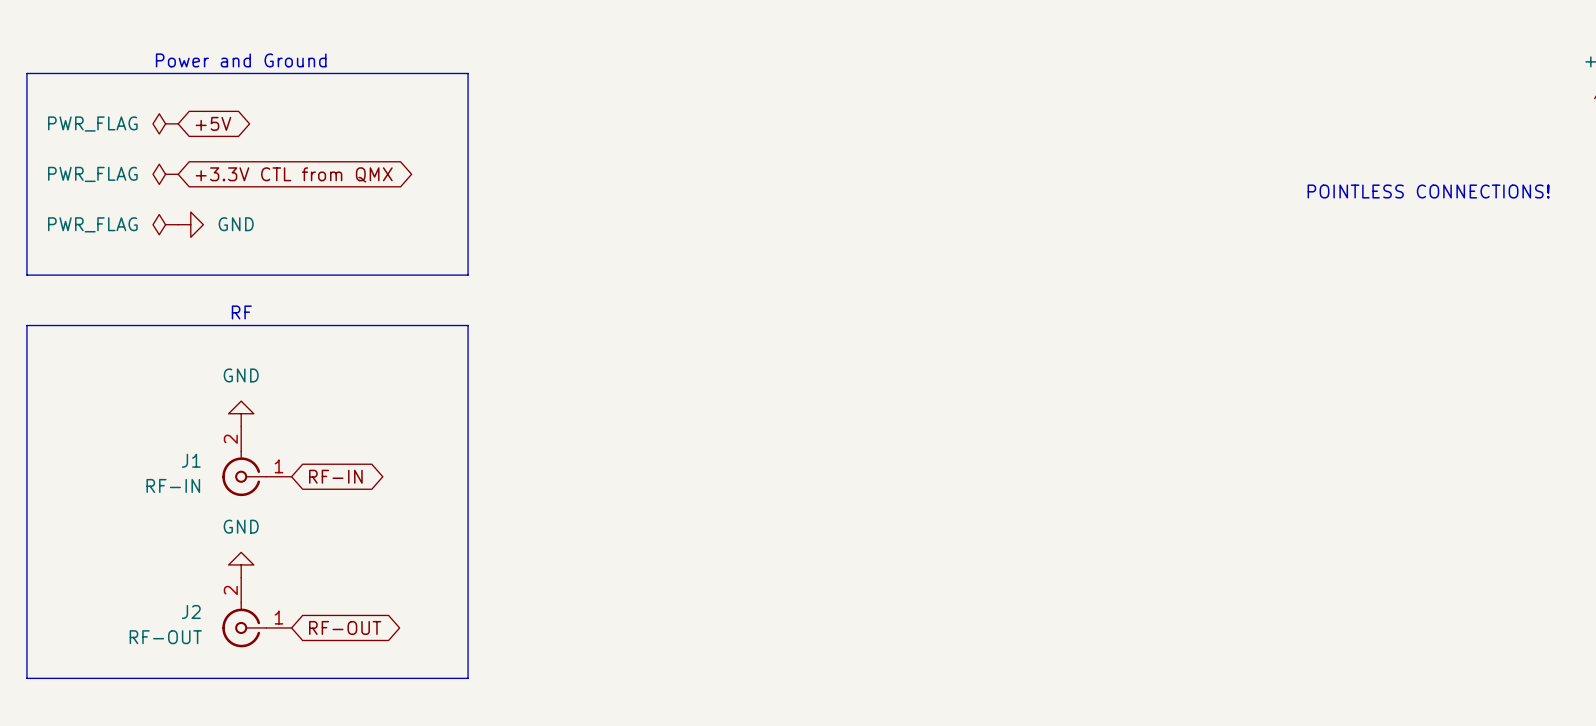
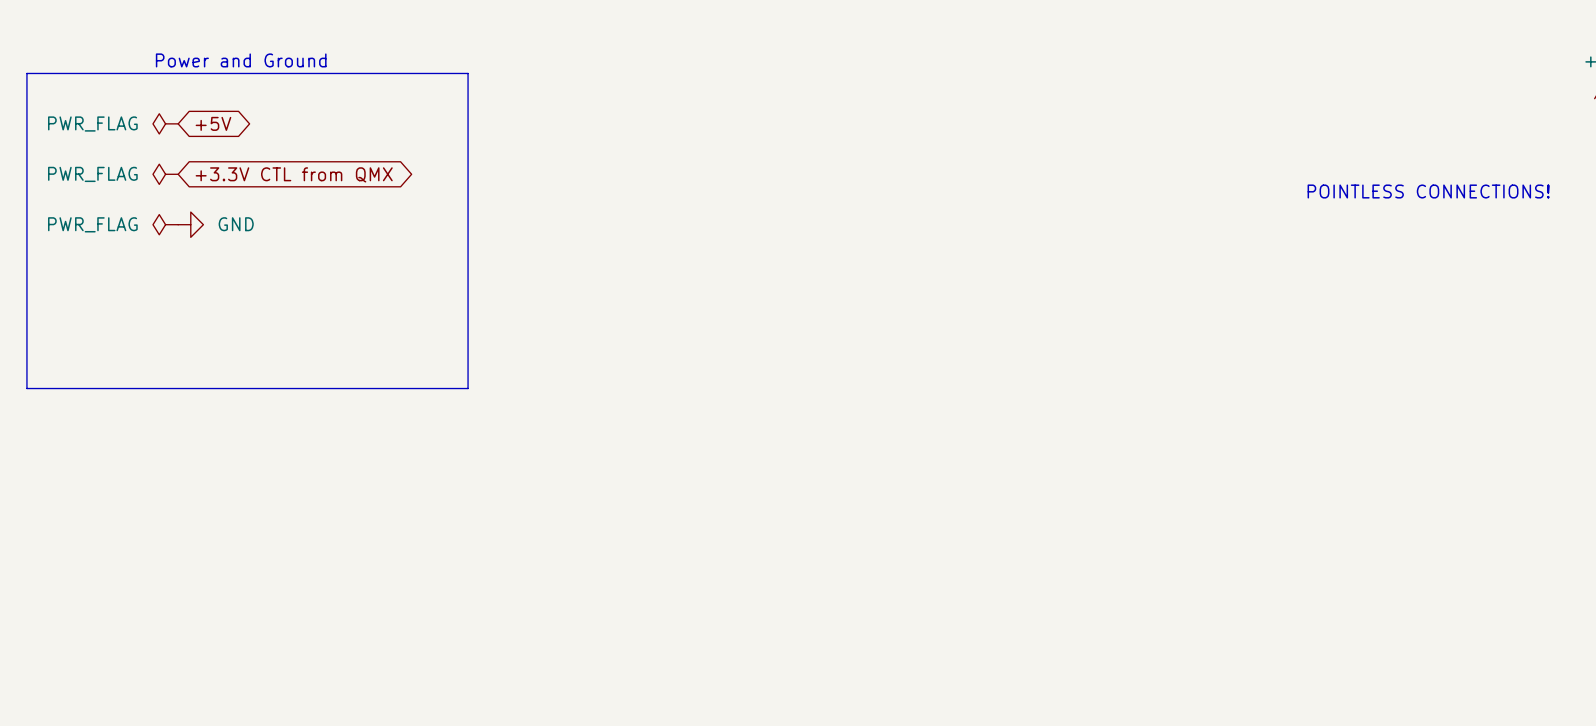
line: (26, 275) (468, 275) -> (26, 275) (26, 325)
text: RF (241, 312) -> none
line: (26, 325) (468, 325) -> (468, 275) (468, 325)
line: (26, 388) (26, 678) (468, 678) (468, 388) -> (26, 388) (468, 388)
power symbol: GND (241, 413) -> none
J1: RF-IN (256, 461) -> none
global label: RF-IN (335, 476) -> none
power symbol: GND (241, 564) -> none
J2: RF-OUT (256, 612) -> none
global label: RF-OUT (345, 627) -> none

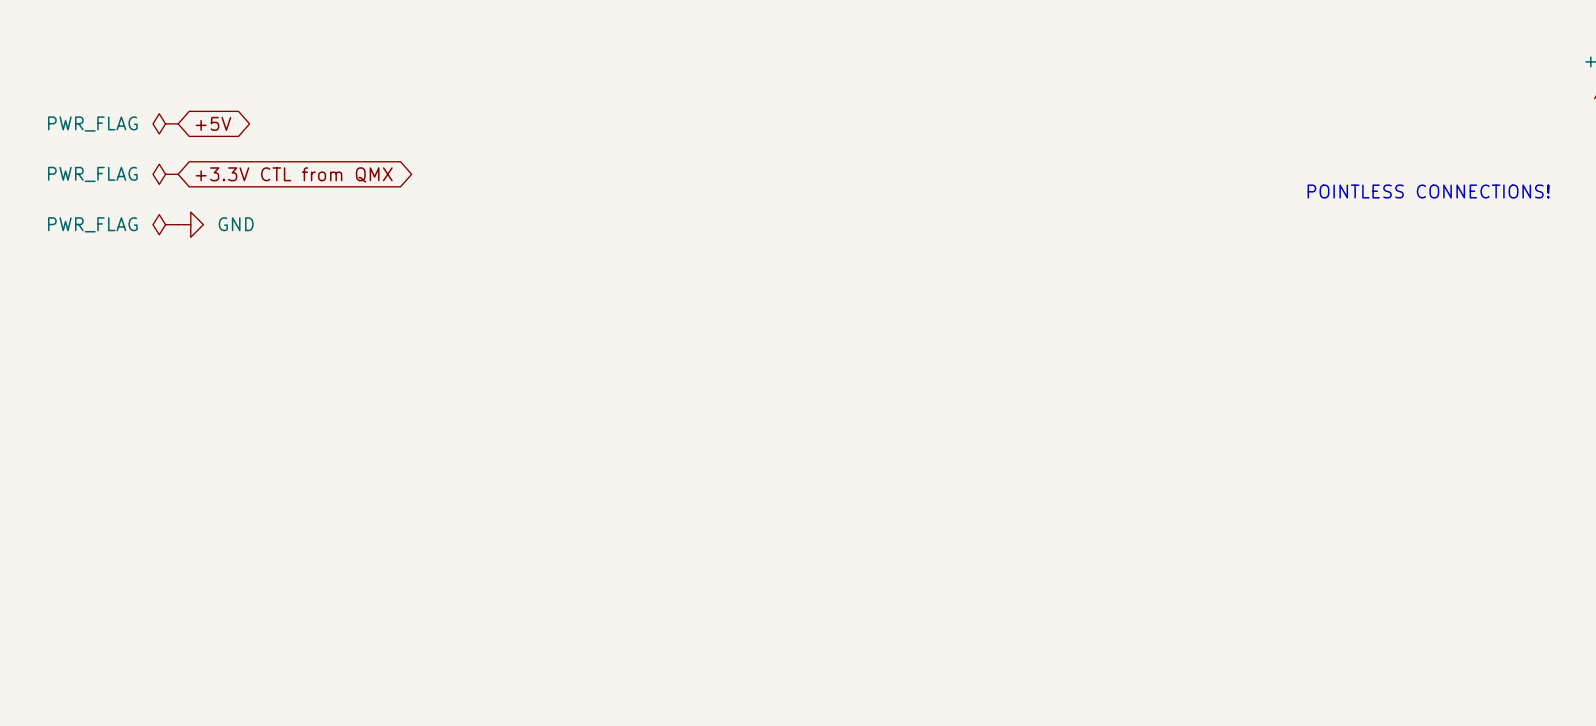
text: Power and Ground (241, 60) -> none
line: (26, 73) (468, 73) (468, 388) (26, 388) (26, 73) -> none

